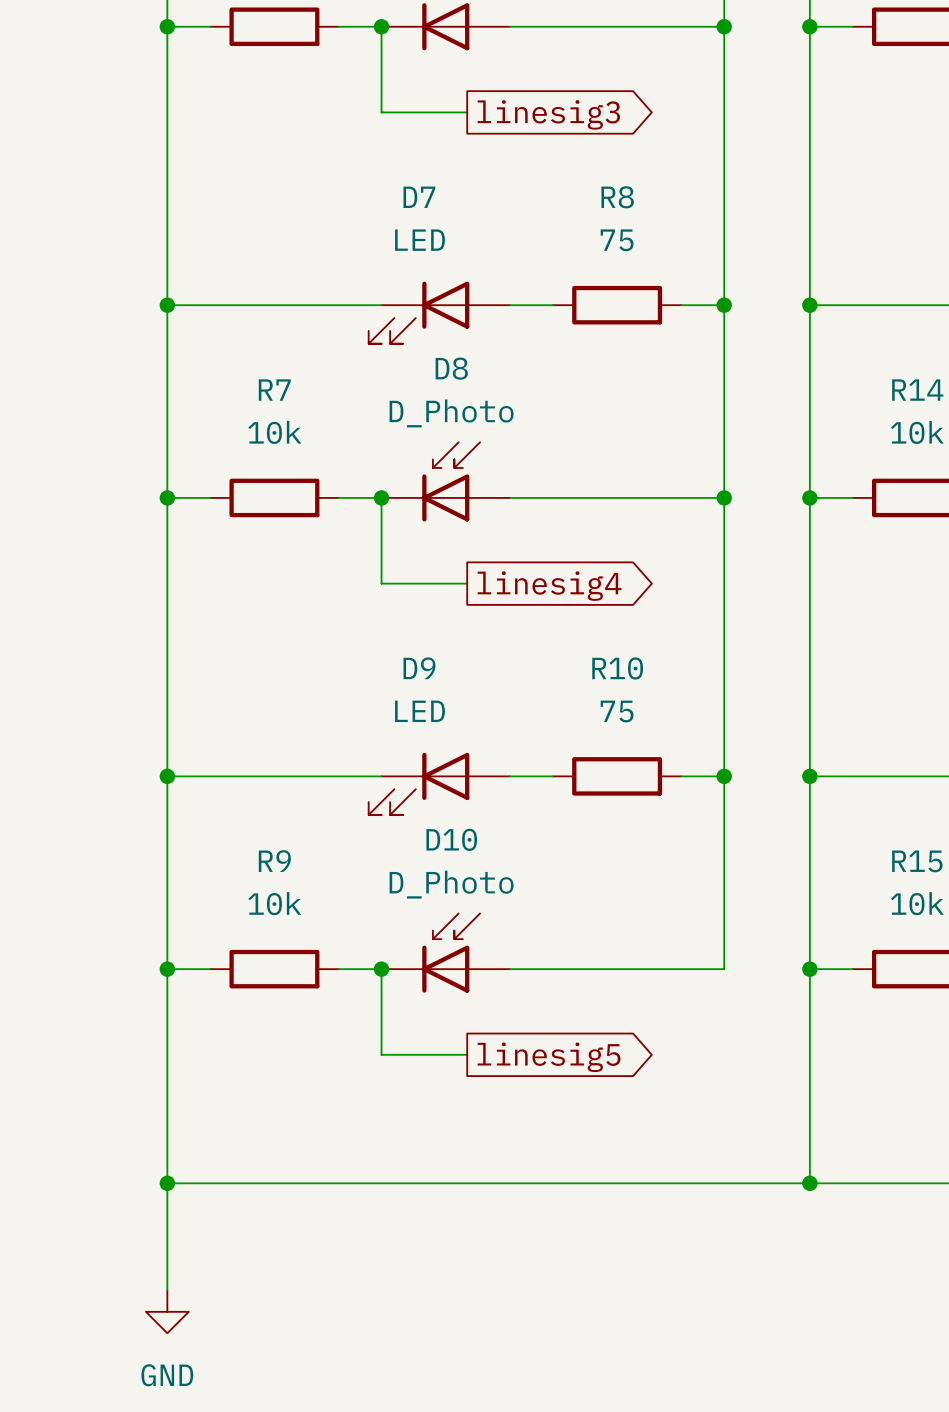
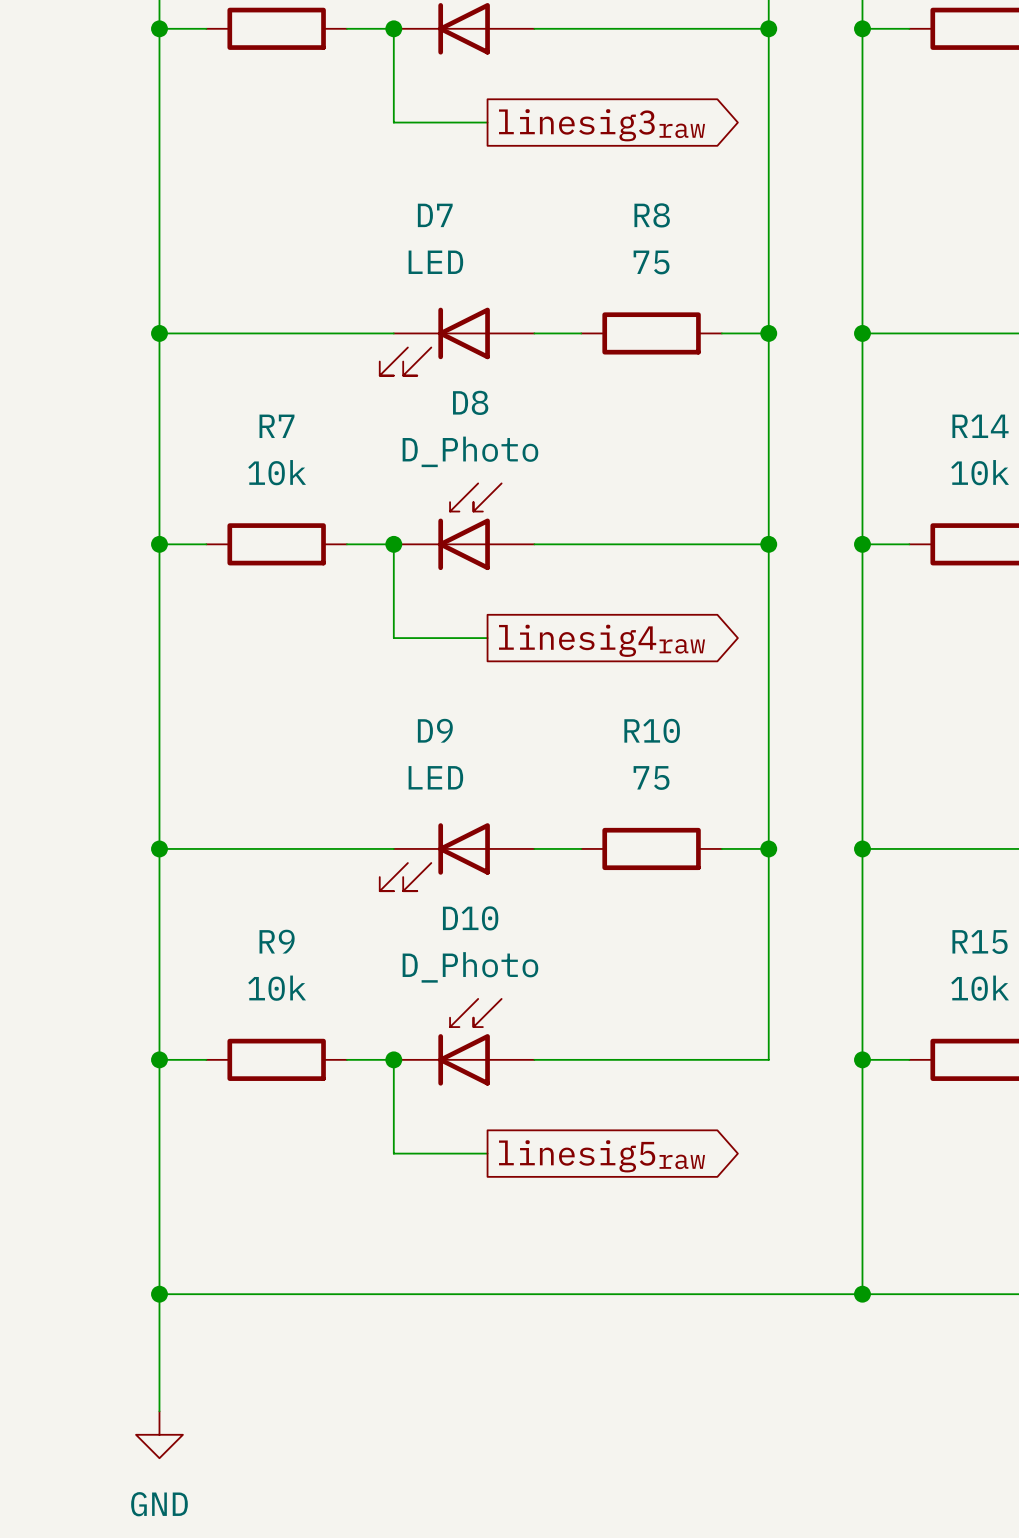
global label: linesig3 (548, 114) -> linesig3raw (602, 125)
global label: linesig4 (549, 586) -> linesig4raw (602, 640)
global label: linesig5 (549, 1057) -> linesig5raw (602, 1156)

